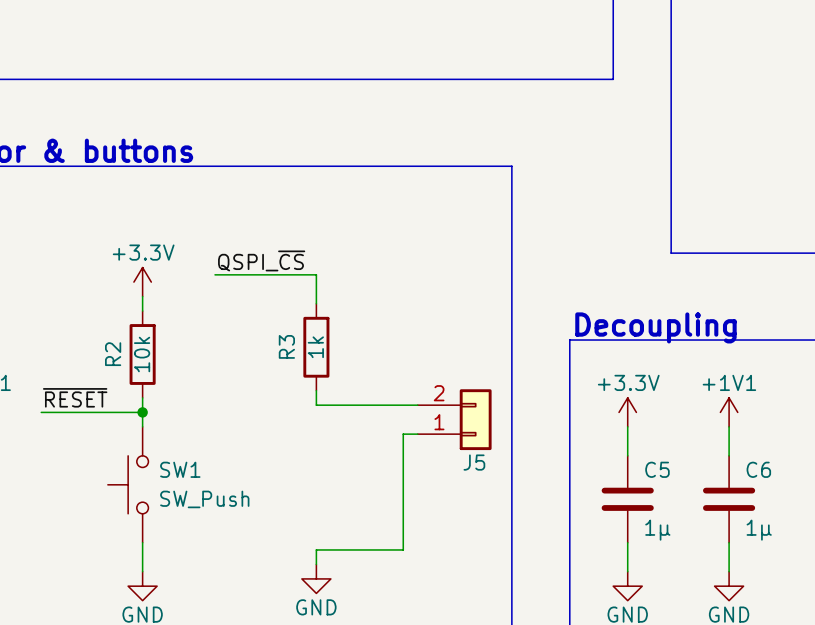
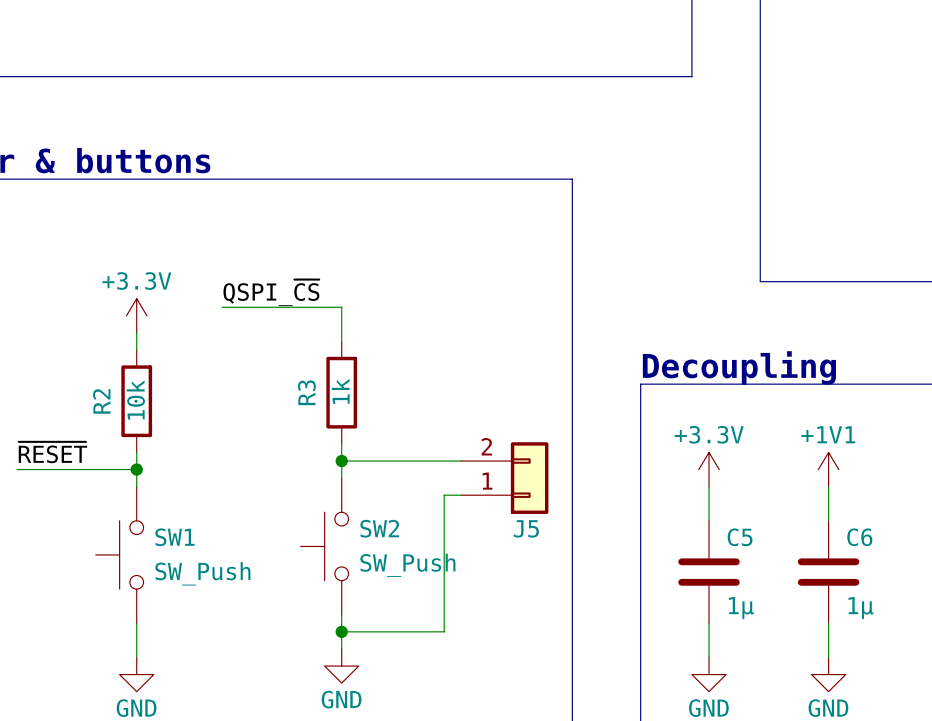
wire: none -> (341, 461) (341, 478)
junction: none -> (341, 461)
SW2: none -> SW_Push (324, 546)
wire: none -> (341, 614) (341, 631)
junction: none -> (341, 631)

